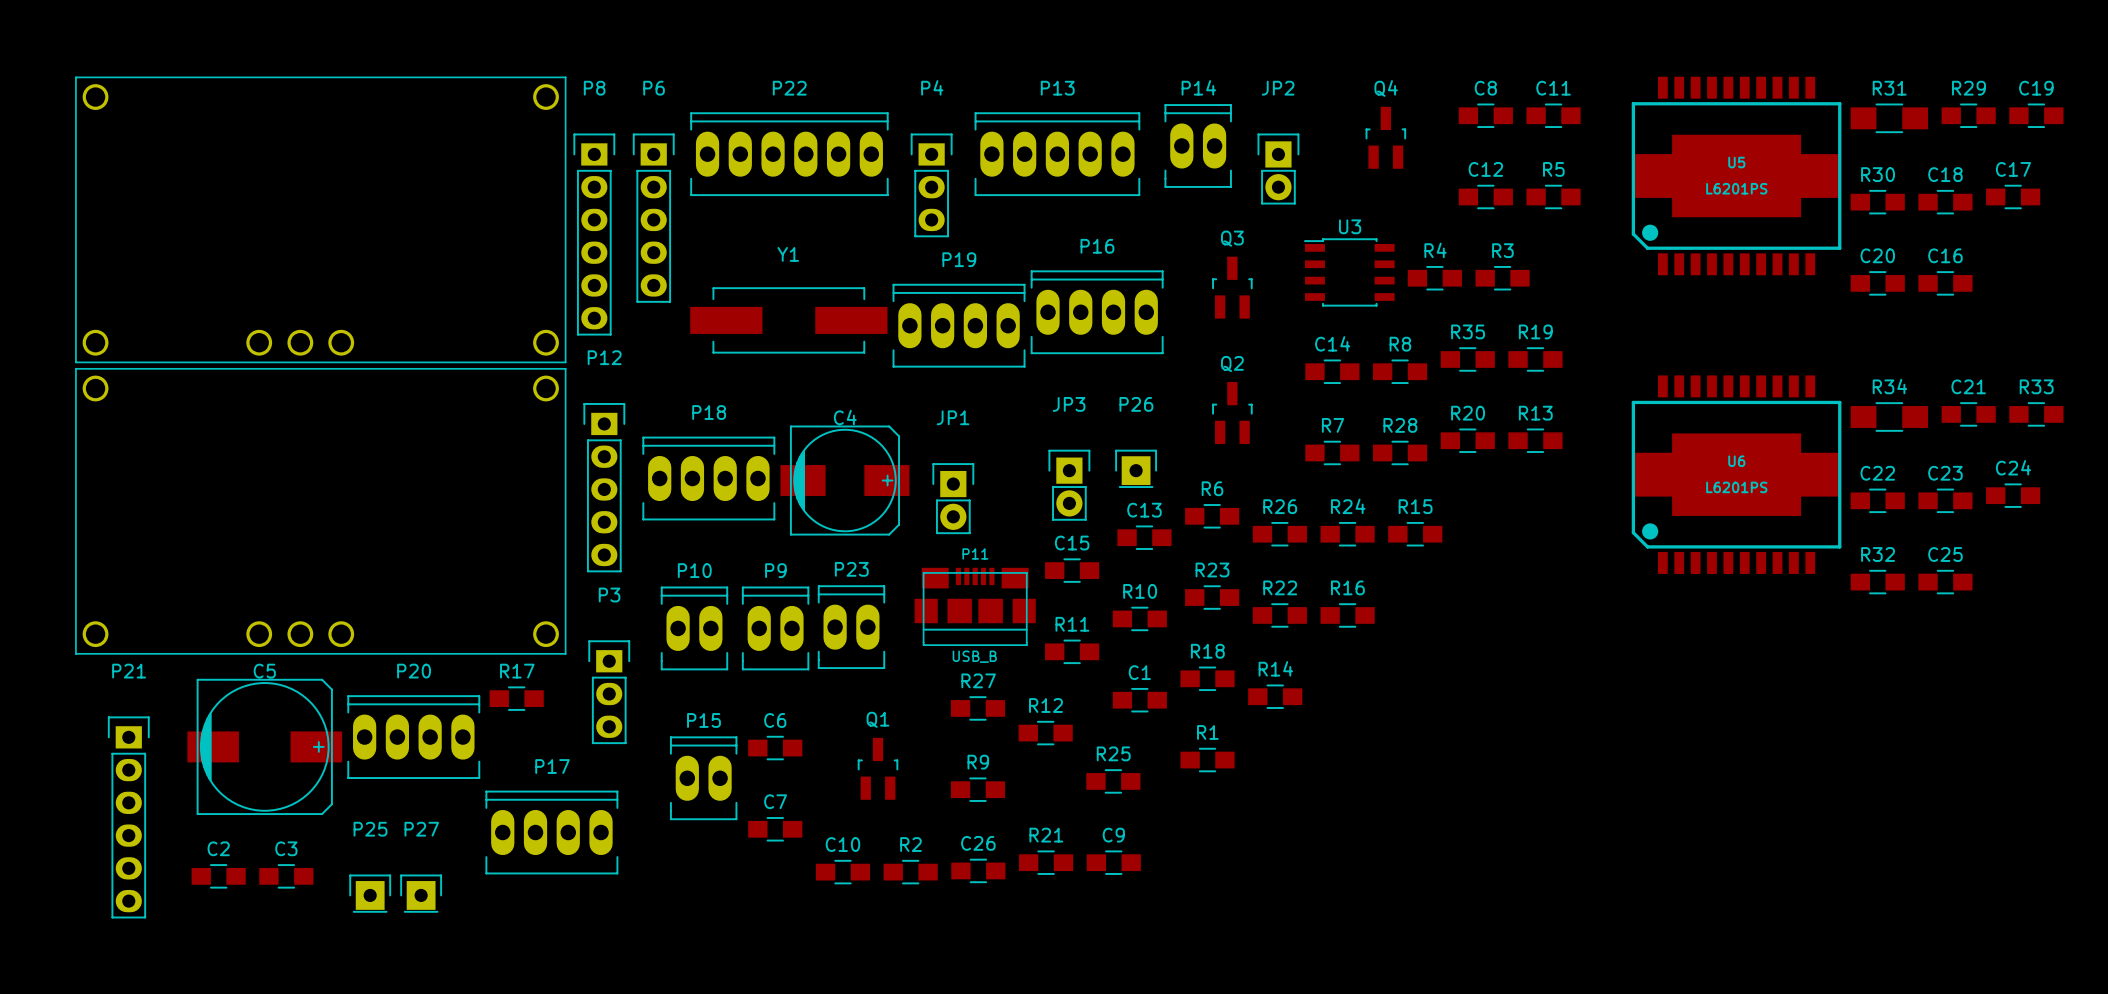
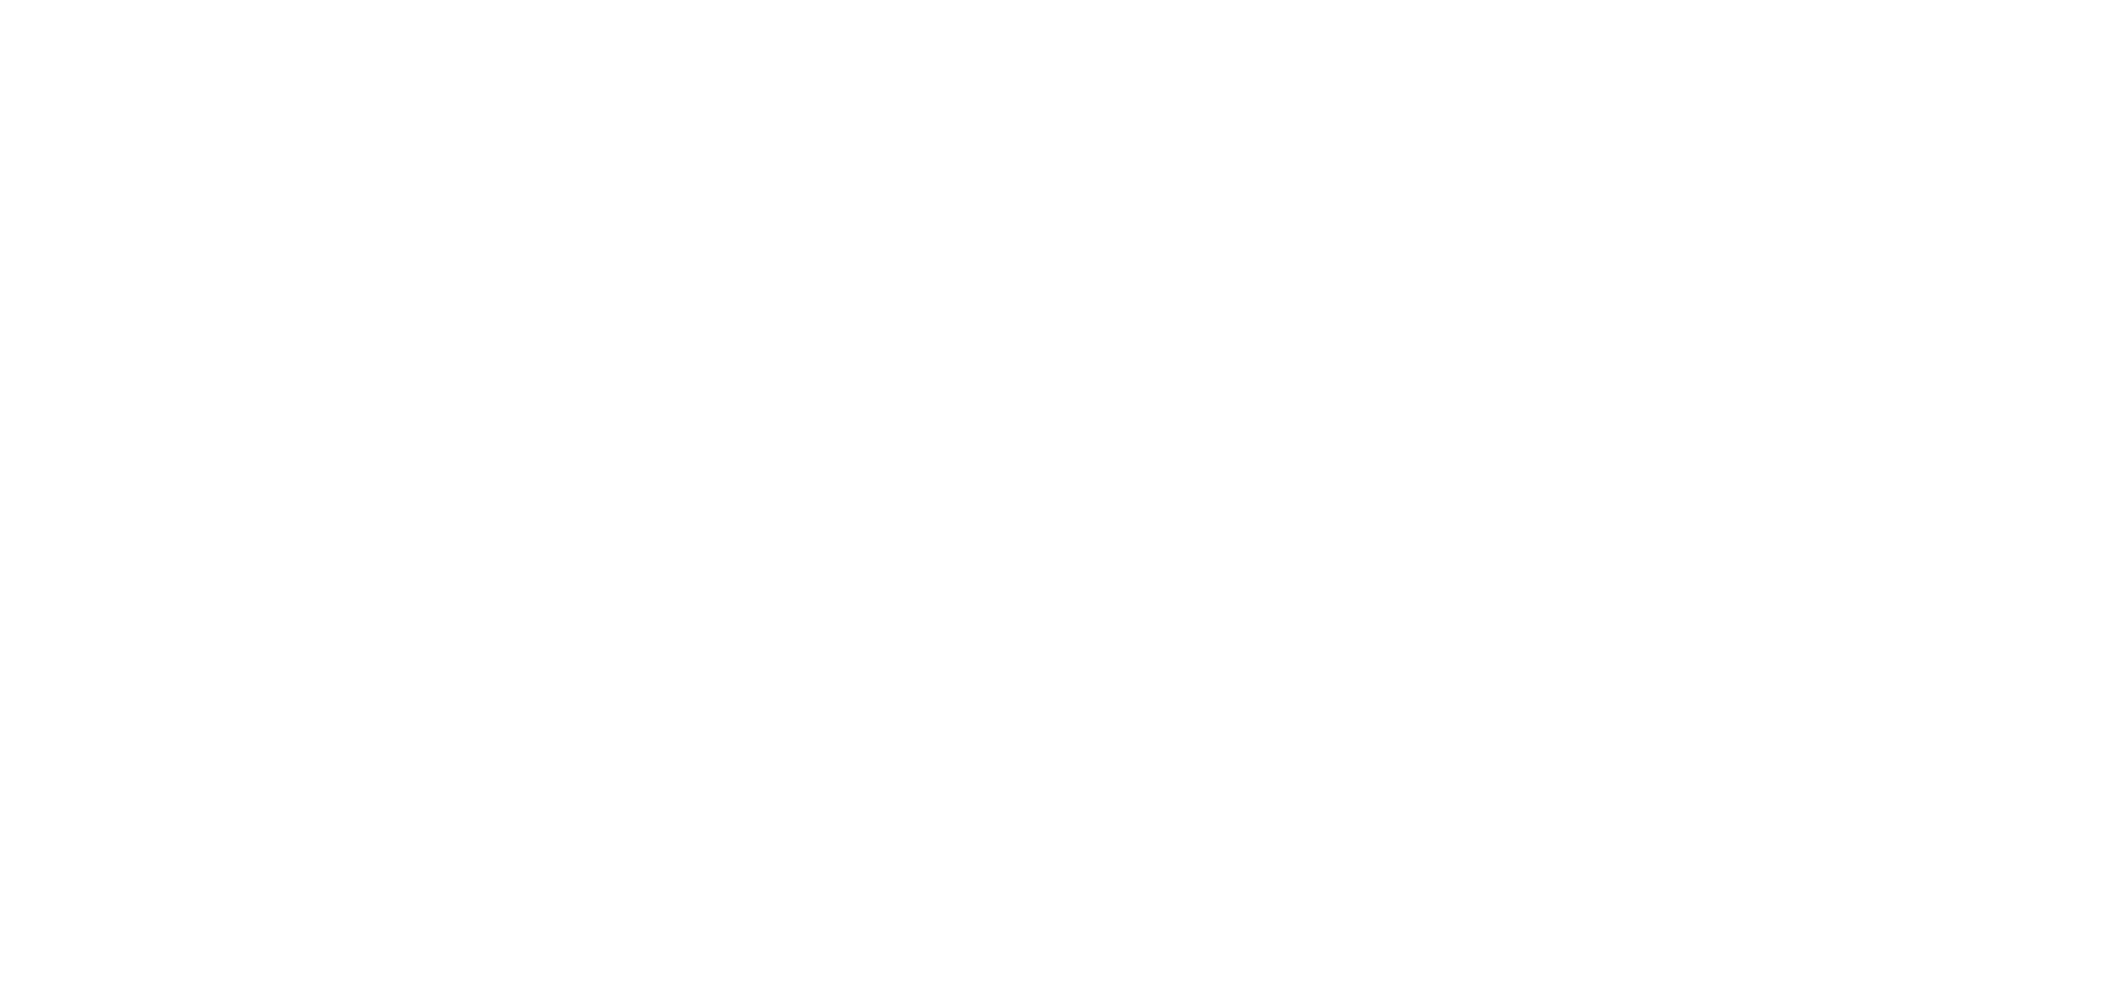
C8: (1485, 115) -> none
C11: (1553, 115) -> none
R29: (1968, 115) -> none
C19: (2036, 115) -> none
R31: (1889, 118) -> none
Q4: (1385, 137) -> none
P14: (1198, 145) -> none
P22: (789, 154) -> none
P13: (1057, 154) -> none
JP2: (1278, 169) -> none
U5: L6201PS (1736, 176) -> none
P4: (931, 185) -> none
C12: (1485, 196) -> none
R5: (1553, 196) -> none
C17: (2013, 196) -> none
R30: (1877, 202) -> none
C18: (1945, 202) -> none
P6: (653, 218) -> none
part: (320, 219) -> none
P8: (594, 234) -> none
U3: (1349, 272) -> none
R4: (1434, 278) -> none
R3: (1502, 278) -> none
C20: (1877, 283) -> none
C16: (1945, 283) -> none
Q3: (1232, 287) -> none
P16: (1097, 312) -> none
Y1: (788, 320) -> none
P19: (959, 325) -> none
R35: (1467, 359) -> none
R19: (1535, 359) -> none
C14: (1332, 371) -> none
R8: (1400, 371) -> none
Q2: (1232, 413) -> none
C21: (1968, 414) -> none
R33: (2036, 414) -> none
R34: (1889, 417) -> none
R20: (1467, 440) -> none
R13: (1535, 440) -> none
R7: (1332, 452) -> none
R28: (1400, 452) -> none
P26: (1136, 468) -> none
U6: L6201PS (1736, 474) -> none
P18: (708, 478) -> none
C4: (844, 480) -> none
JP3: (1069, 485) -> none
P12: (604, 487) -> none
C24: (2013, 495) -> none
JP1: (953, 498) -> none
C22: (1877, 500) -> none
C23: (1945, 500) -> none
part: (320, 511) -> none
R6: (1212, 516) -> none
R26: (1279, 534) -> none
R24: (1347, 534) -> none
R15: (1415, 534) -> none
C13: (1144, 537) -> none
C15: (1072, 570) -> none
R32: (1877, 582) -> none
C25: (1945, 582) -> none
R23: (1212, 597) -> none
P11: USB_B (975, 606) -> none
R22: (1279, 615) -> none
R16: (1347, 615) -> none
R10: (1139, 618) -> none
P23: (851, 627) -> none
P10: (694, 628) -> none
P9: (775, 628) -> none
R11: (1072, 651) -> none
R18: (1207, 678) -> none
P3: (609, 692) -> none
R14: (1275, 696) -> none
R17: (516, 698) -> none
C1: (1139, 700) -> none
R27: (977, 708) -> none
R12: (1045, 733) -> none
P20: (413, 737) -> none
C5: (264, 746) -> none
C6: (775, 748) -> none
R1: (1207, 760) -> none
Q1: (878, 768) -> none
P15: (703, 778) -> none
R25: (1113, 781) -> none
R9: (977, 789) -> none
P21: (128, 817) -> none
C7: (775, 829) -> none
P17: (551, 832) -> none
R21: (1046, 862) -> none
C9: (1113, 862) -> none
C26: (978, 870) -> none
C10: (842, 872) -> none
R2: (910, 872) -> none
C2: (218, 876) -> none
C3: (286, 876) -> none
P25: (370, 893) -> none
P27: (421, 893) -> none

